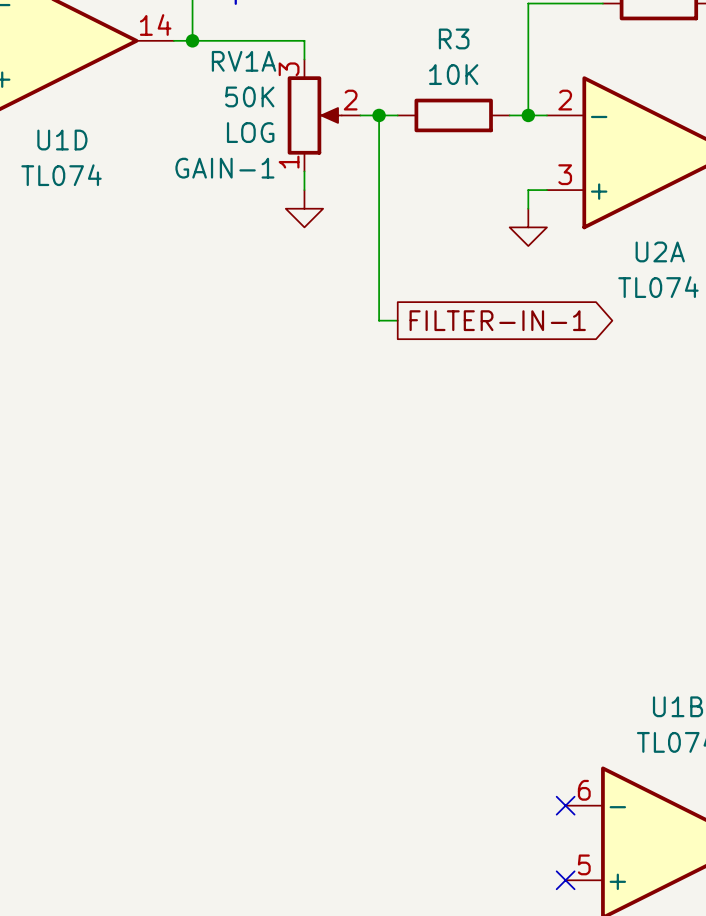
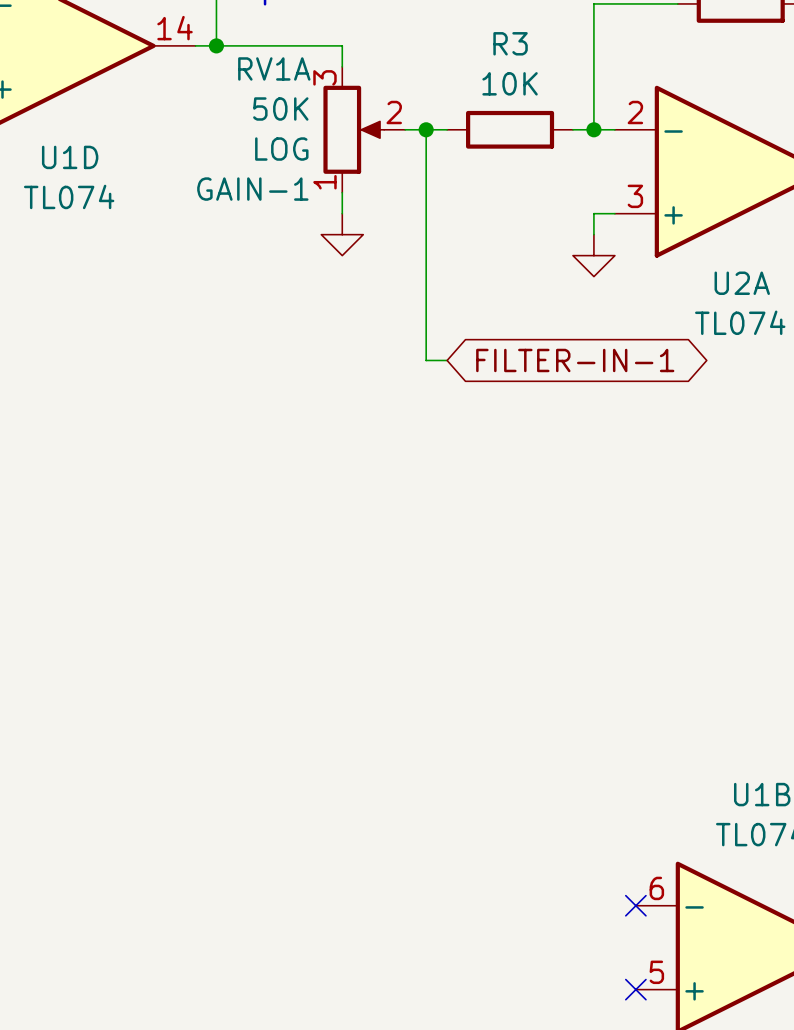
global label shape: output (497, 320) -> bidirectional (575, 360)

